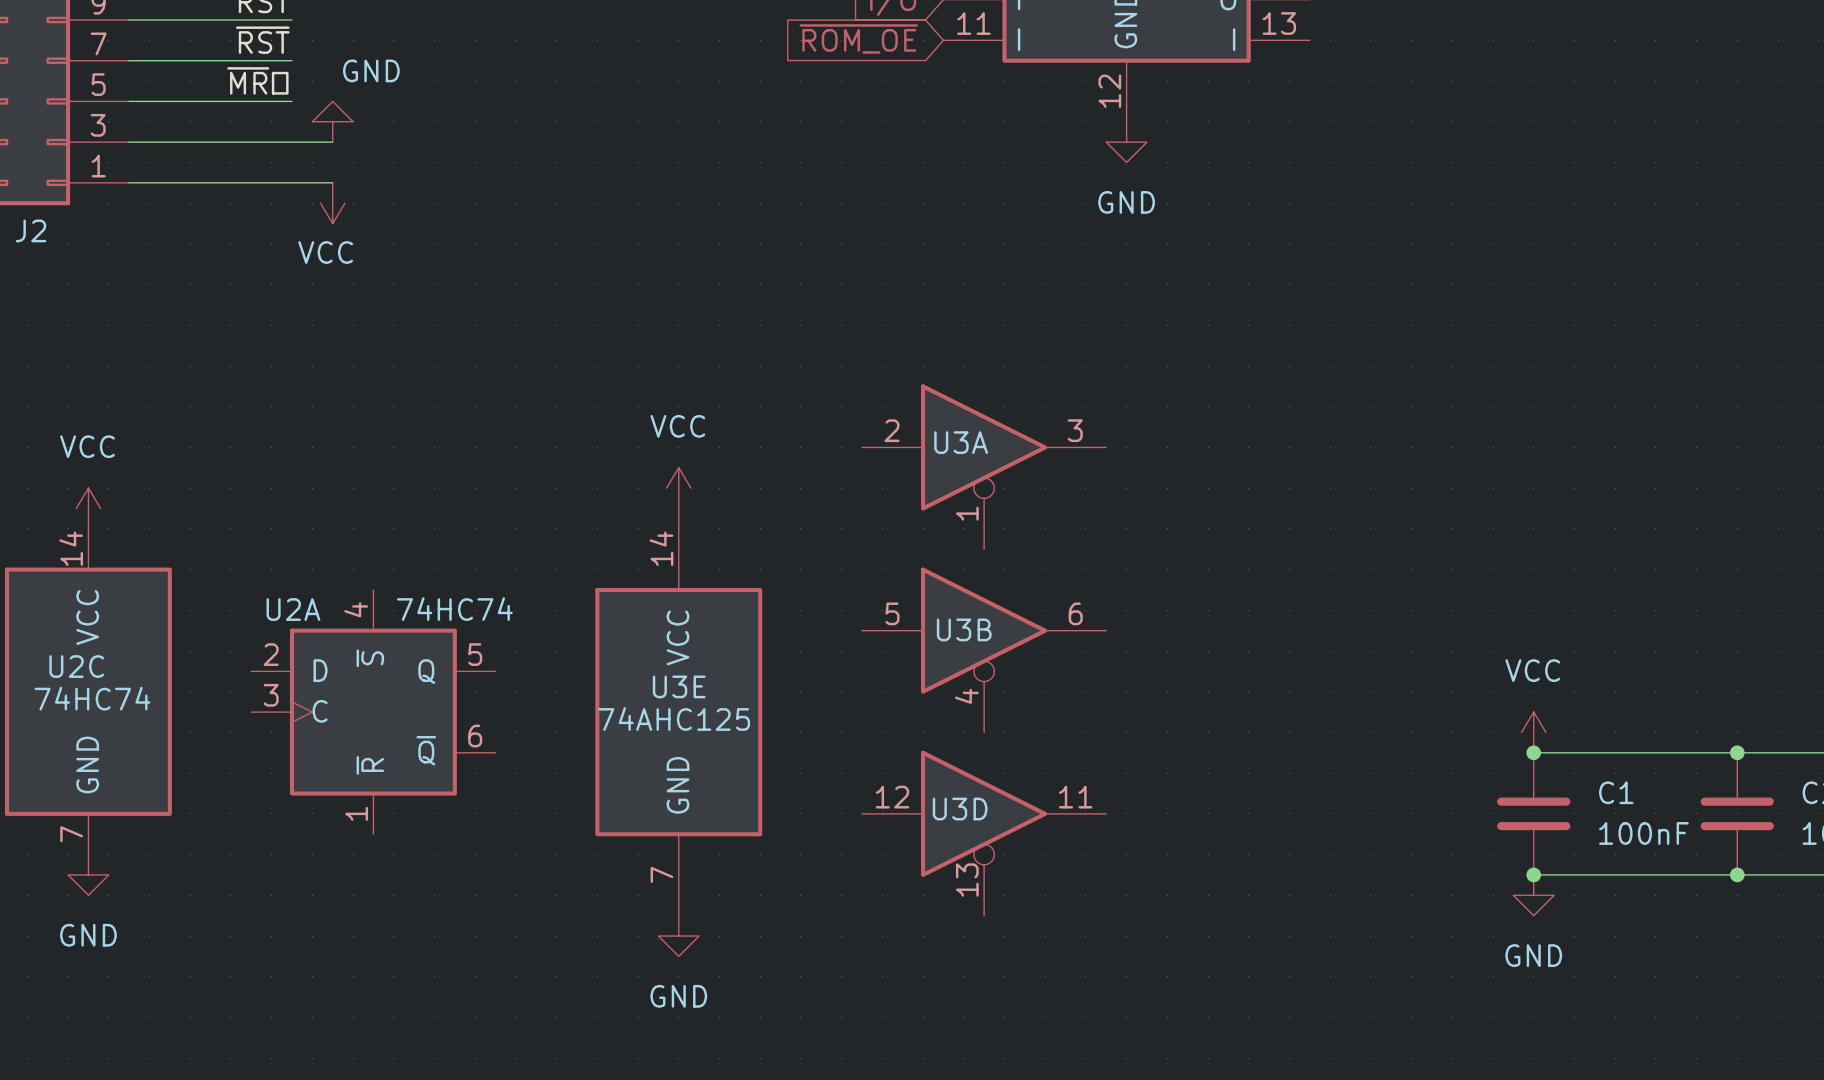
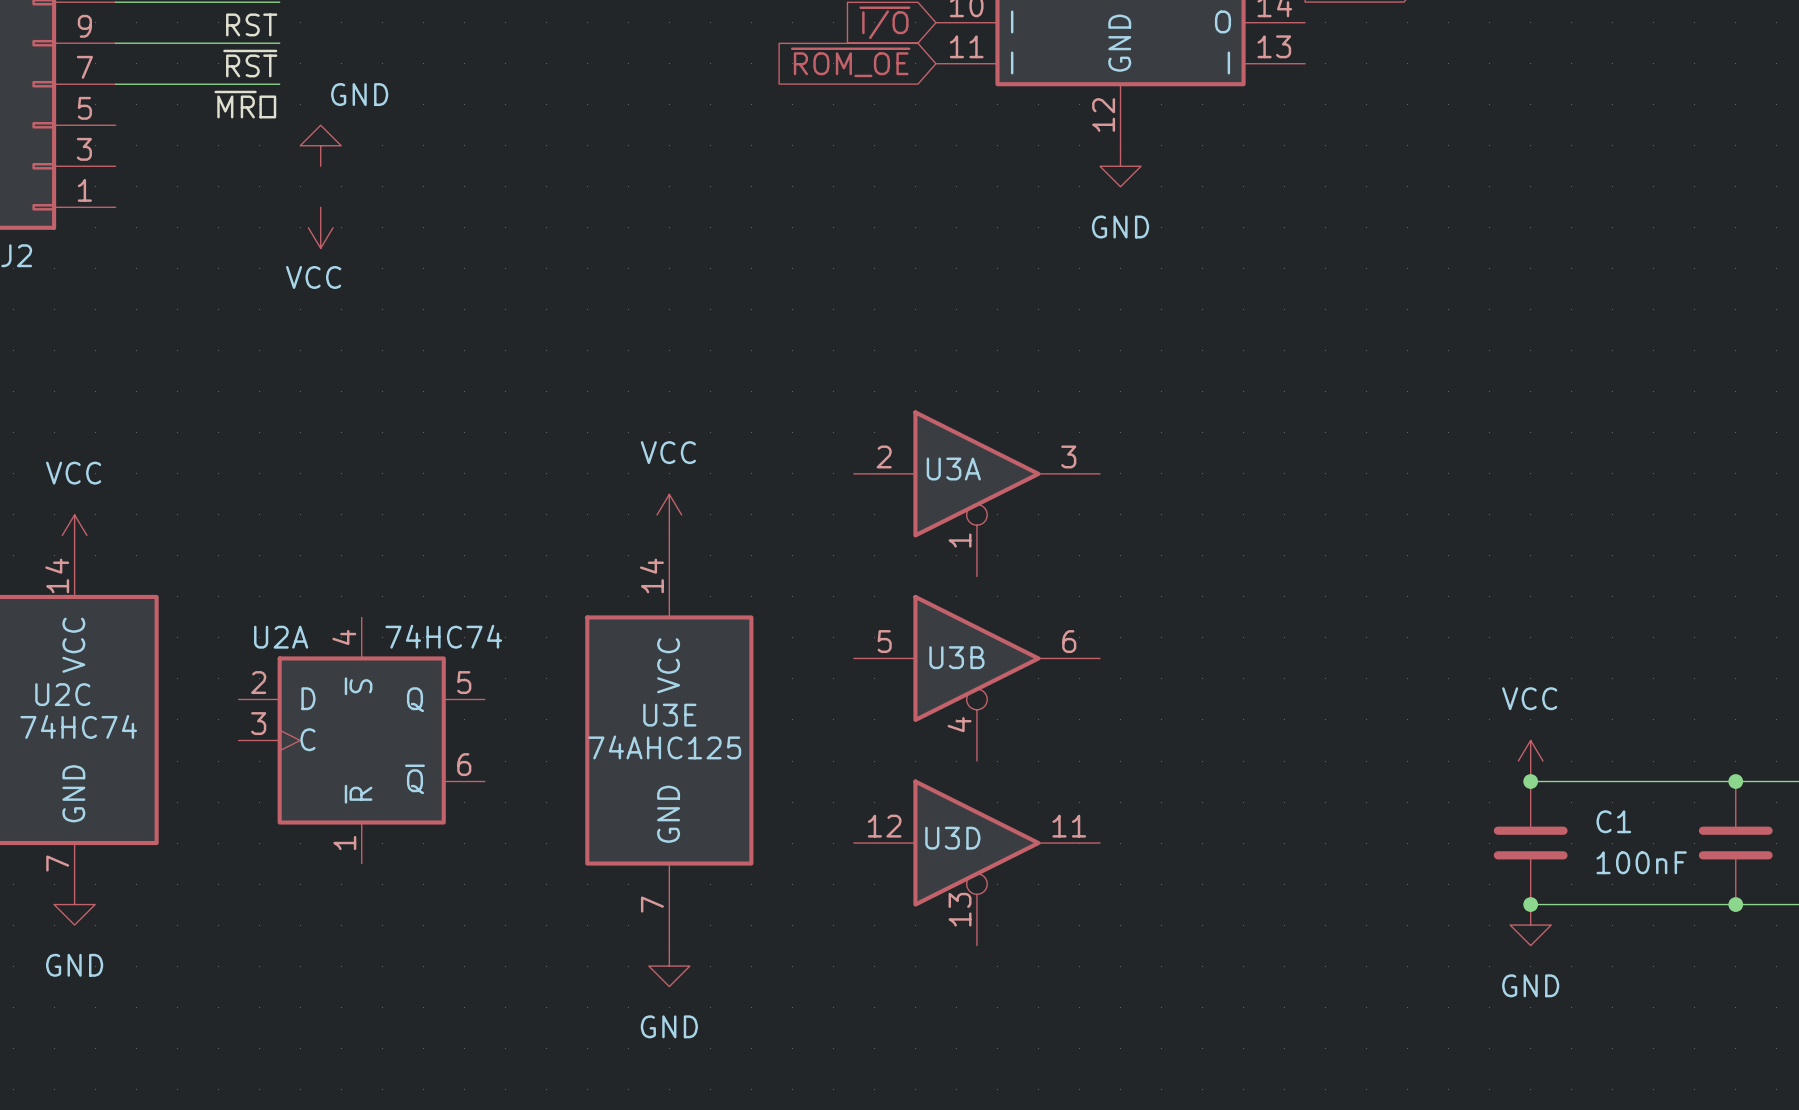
wire: (129, 101) (292, 101) -> none
wire: (129, 142) (332, 142) -> none
wire: (129, 182) (332, 182) -> none

